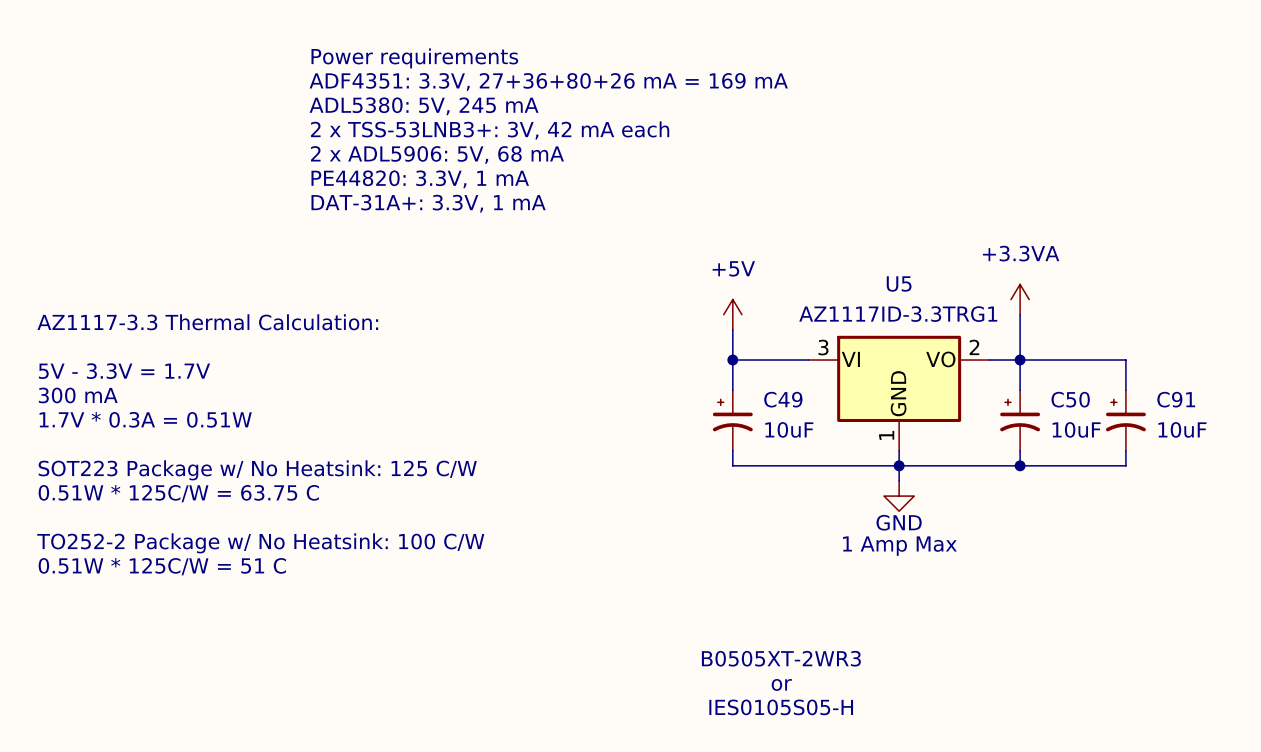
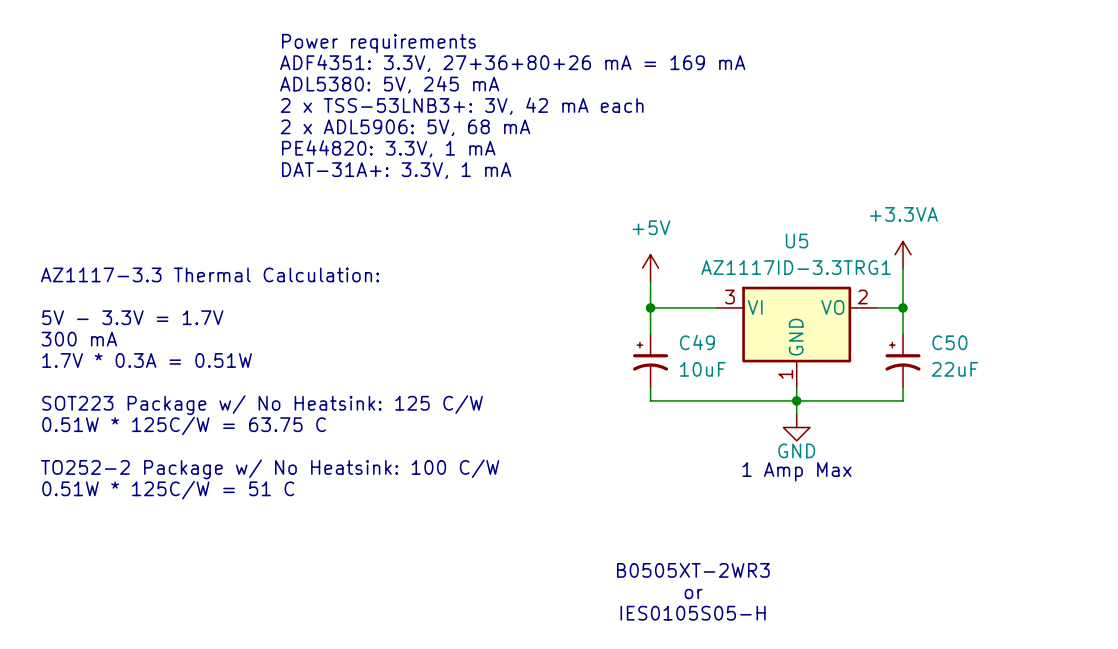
wire: (1020, 360) (1125, 360) (1125, 390) -> none
C91: 10uF (1125, 420) -> none
C50 value: 10uF (1076, 429) -> 22uF (954, 369)
wire: (1125, 450) (1125, 465) (1020, 465) -> none
junction: (1020, 465) -> none

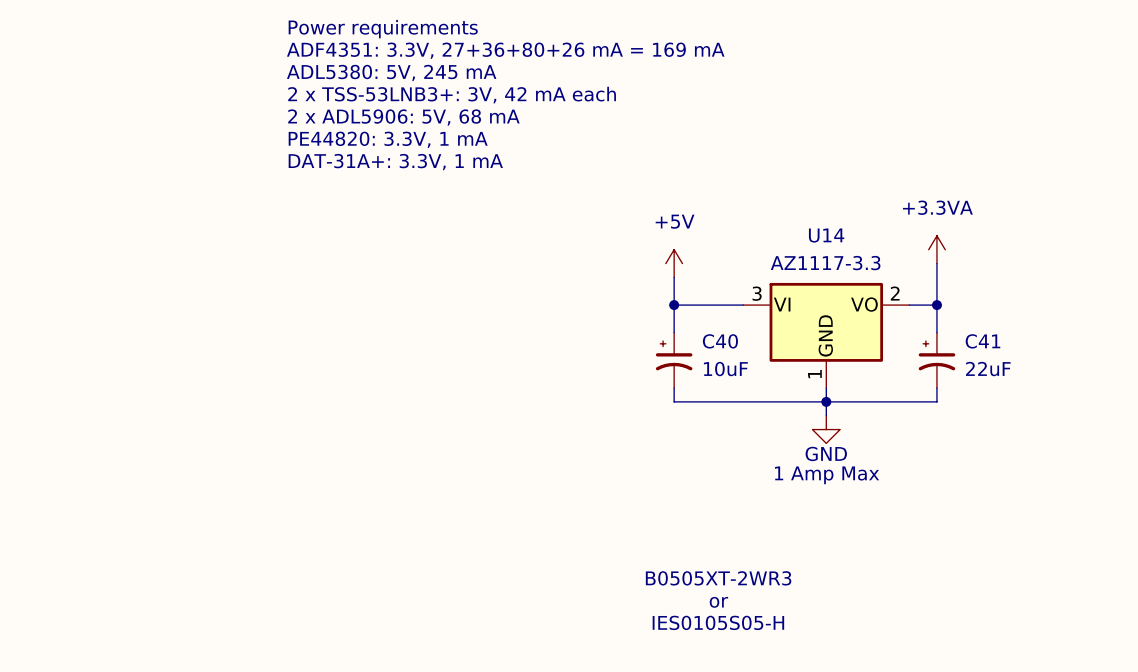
U5 name: U5 (797, 241) -> U14 (826, 235)
U5 value: AZ1117ID-3.3TRG1 (796, 267) -> AZ1117-3.3 (825, 263)
text: AZ1117-3.3 Thermal Calculation: (210, 274) -> none
text: 5V - 3.3V = 1.7V (132, 317) -> none
text: 300 mA (79, 339) -> none
C49 name: C49 (697, 342) -> C40 (720, 341)
C50 name: C50 (949, 342) -> C41 (982, 341)
text: 1.7V * 0.3A = 0.51W (147, 360) -> none
text: SOT223 Package w/ No Heatsink: 125 C/W (262, 405) -> none
text: 0.51W * 125C/W = 63.75 C (184, 425) -> none
text: TO252-2 Package w/ No Heatsink: 100 C/W (270, 469) -> none
text: 0.51W * 125C/W = 51 C (168, 490) -> none

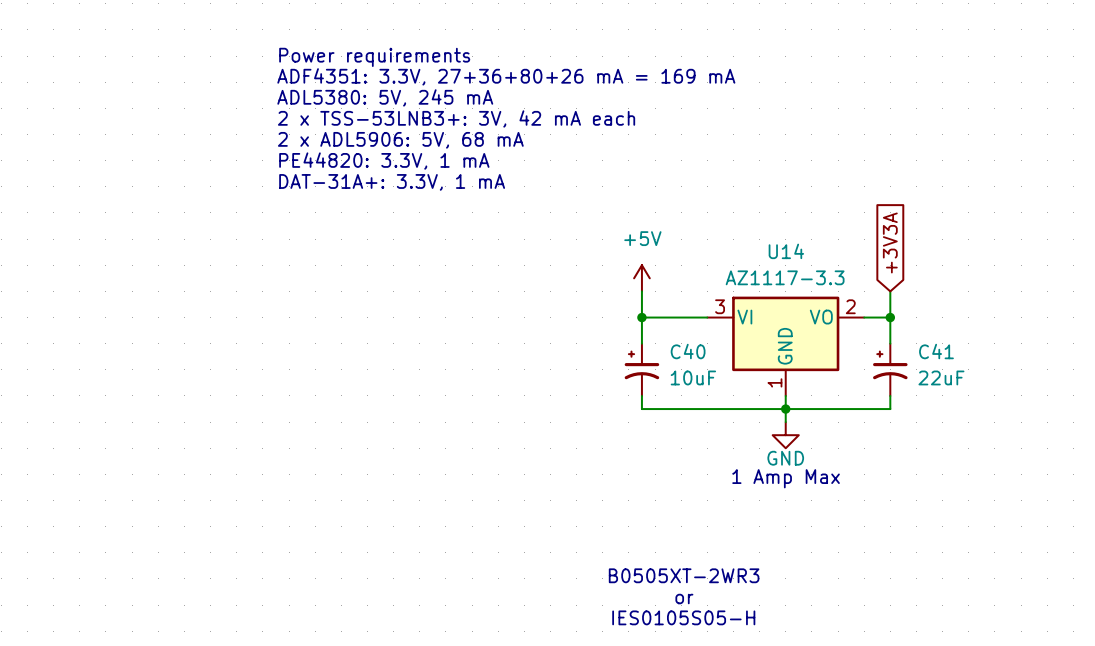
global label: none -> +3V3A (890, 242)
power symbol: +3.3VA (936, 249) -> none
wire: (936, 263) (936, 277) -> none

